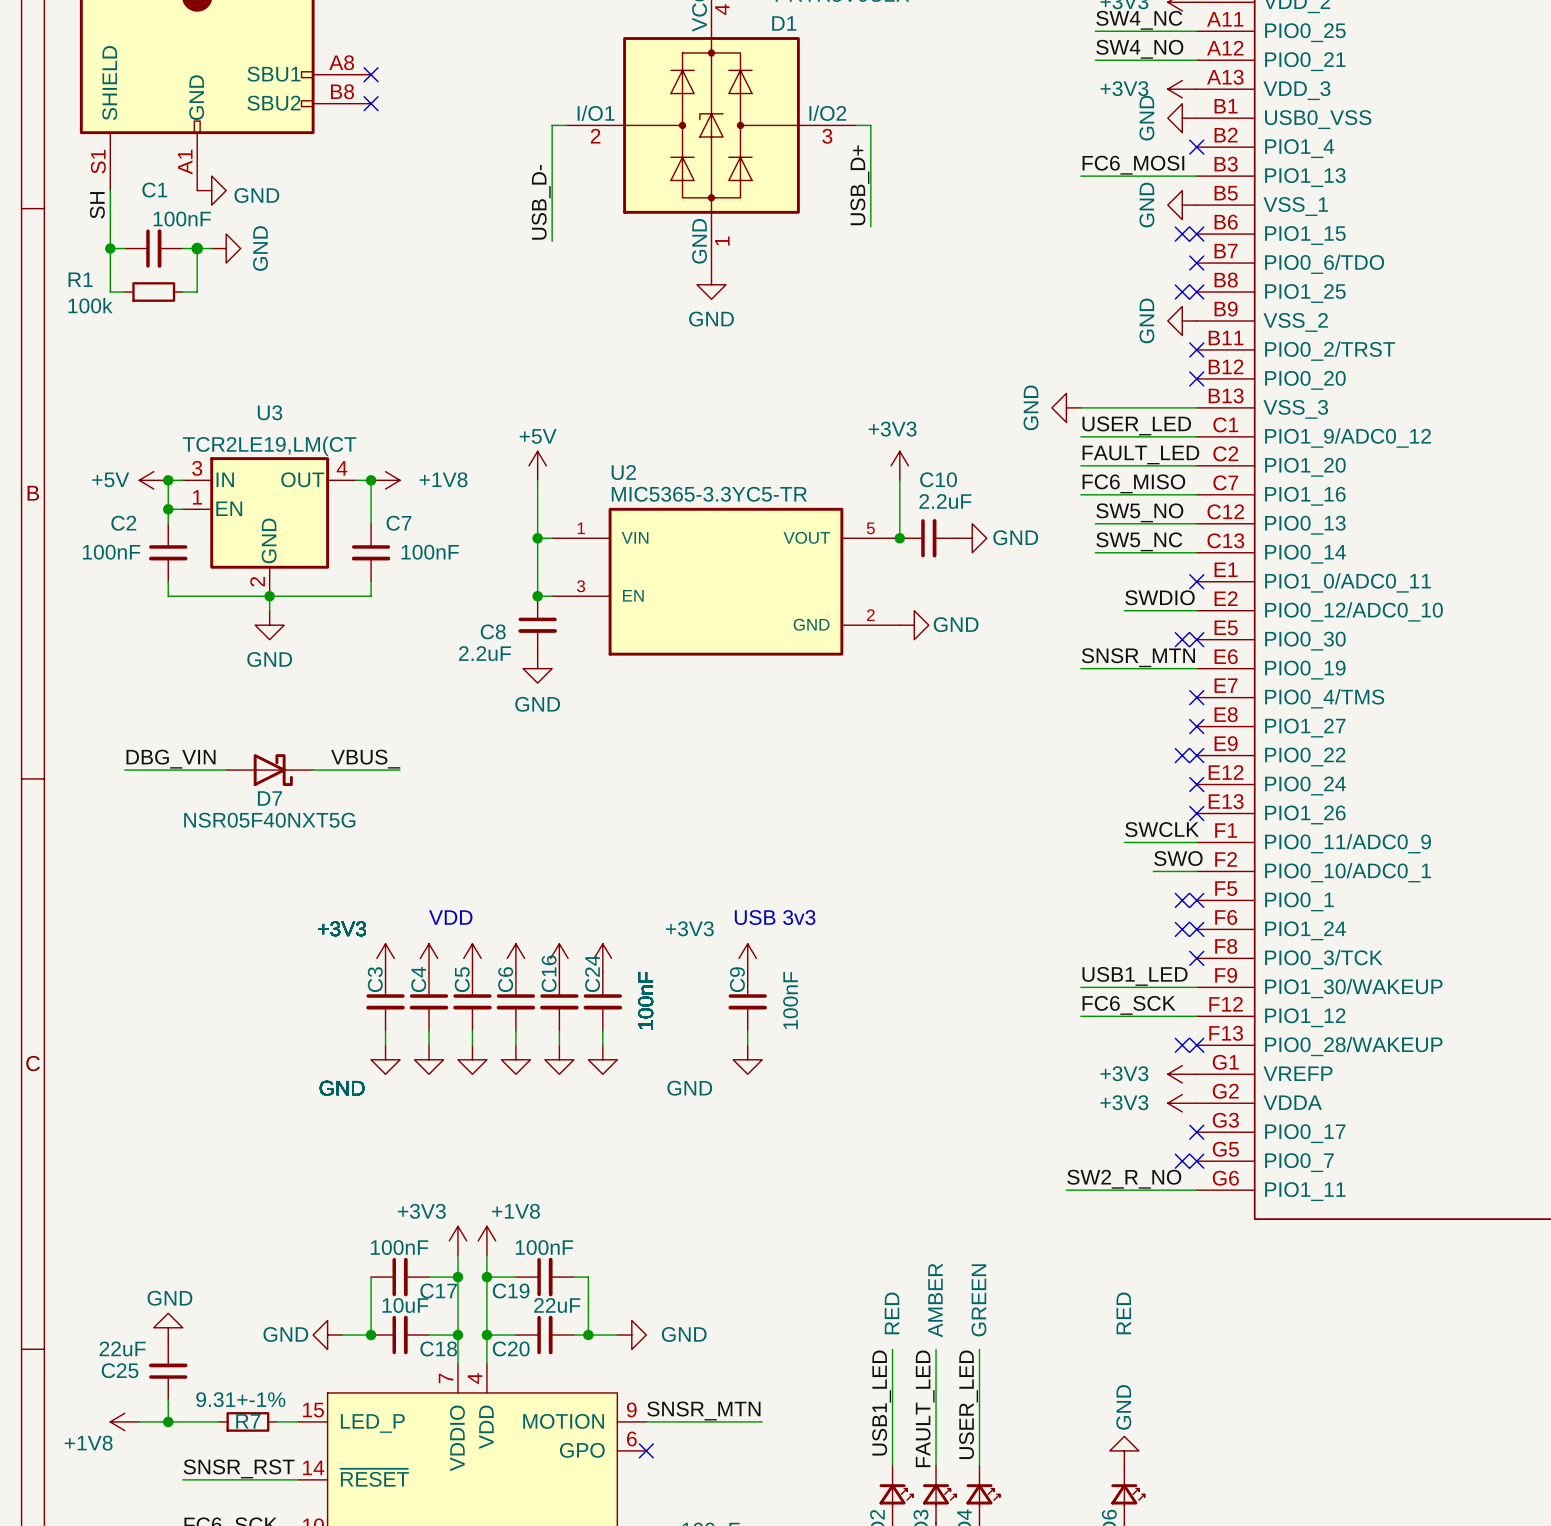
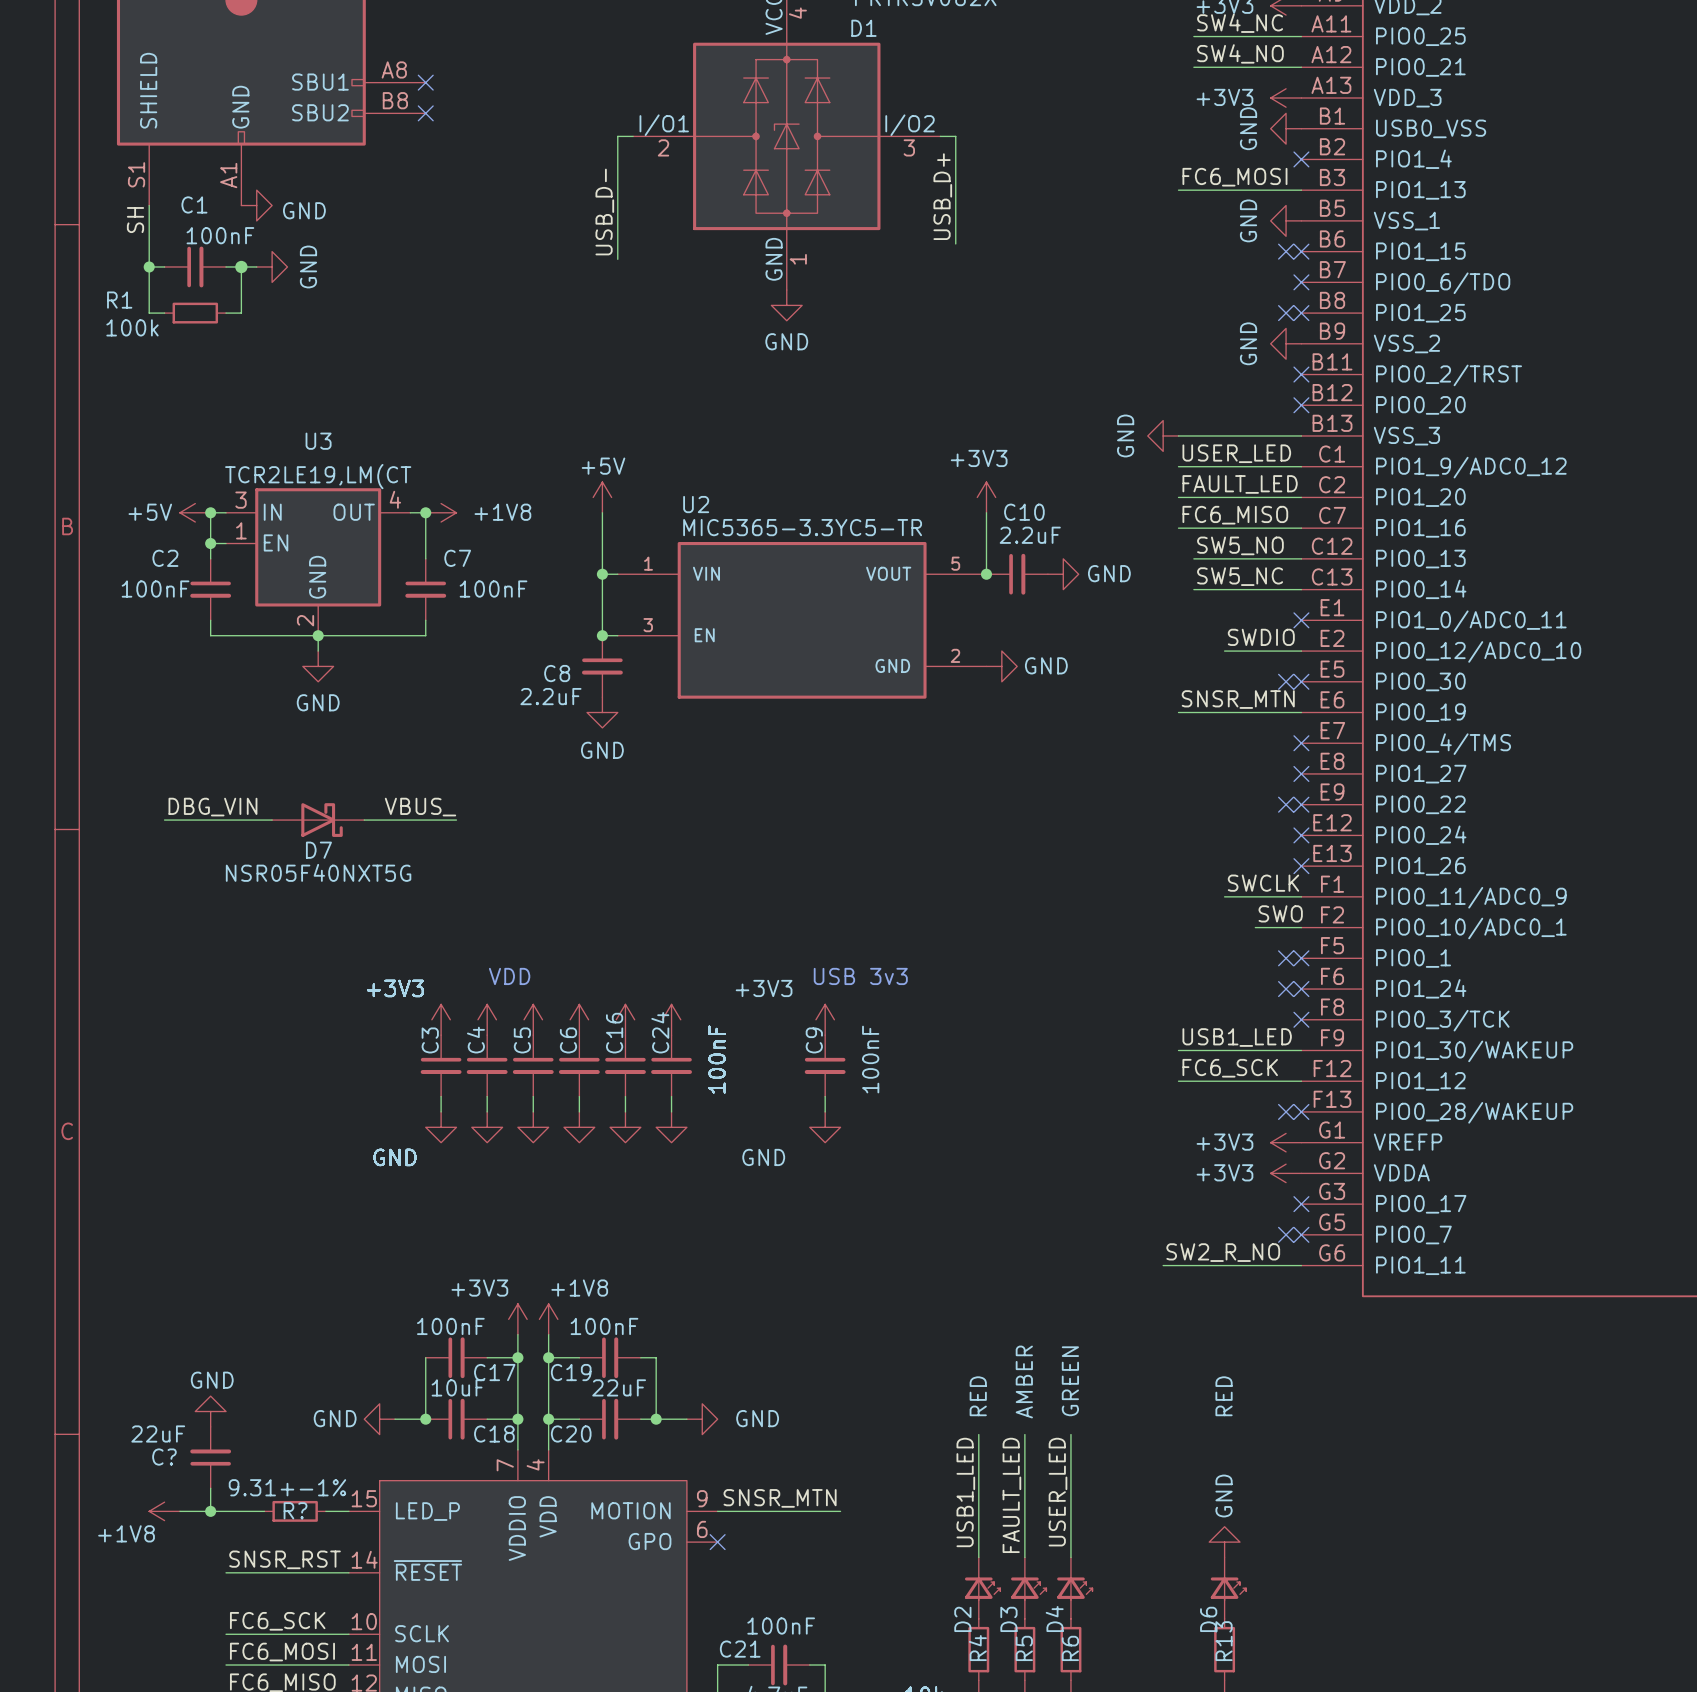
C25 name: C25 (120, 1370) -> C? (164, 1457)
R7 name: R7 (248, 1421) -> R? (295, 1510)

